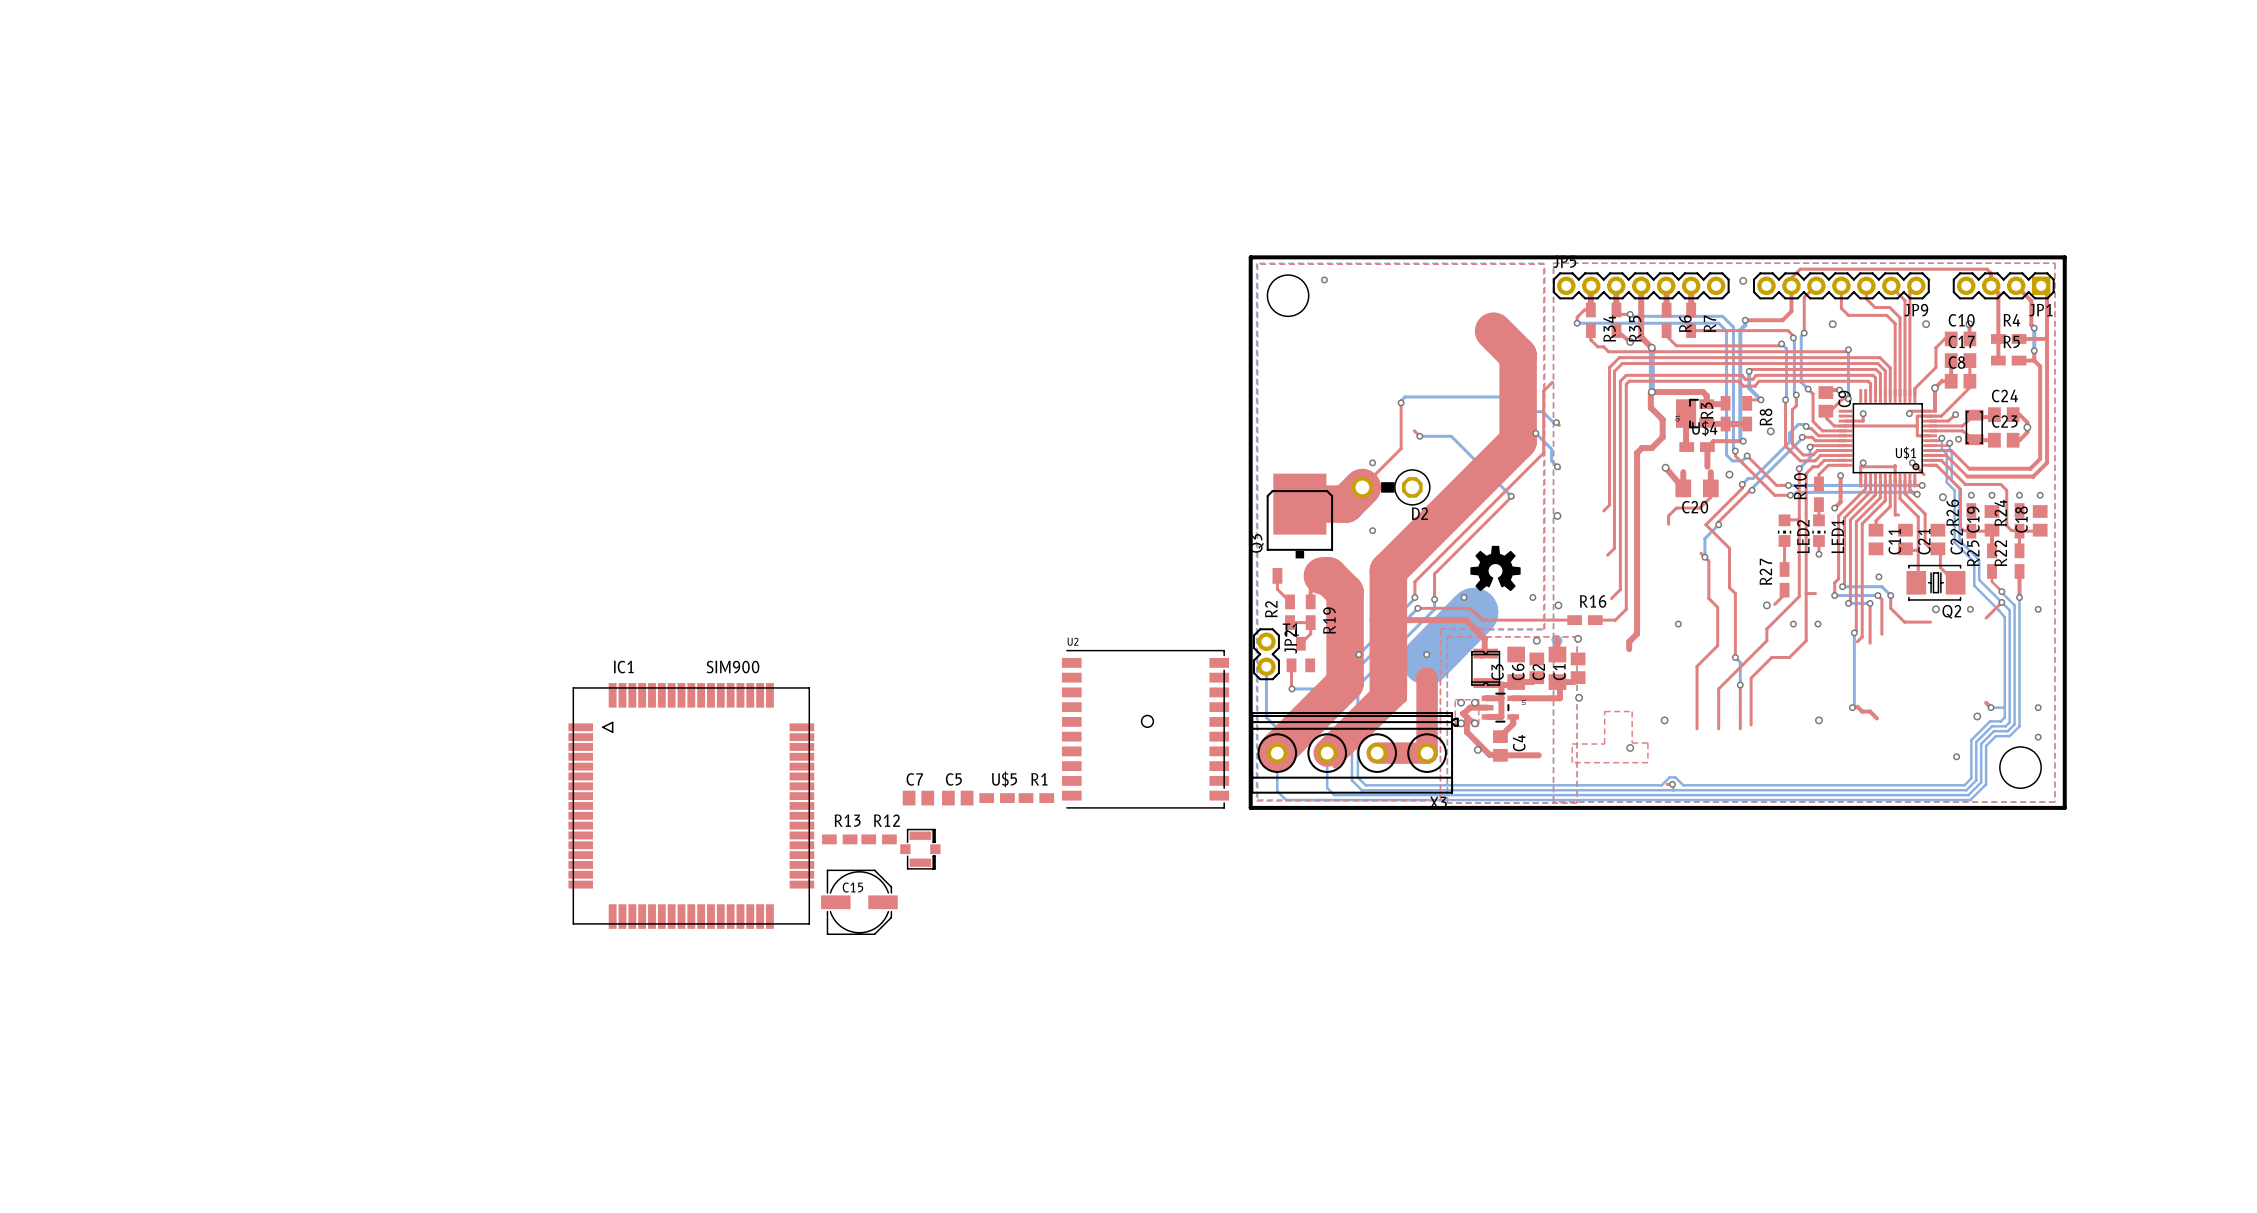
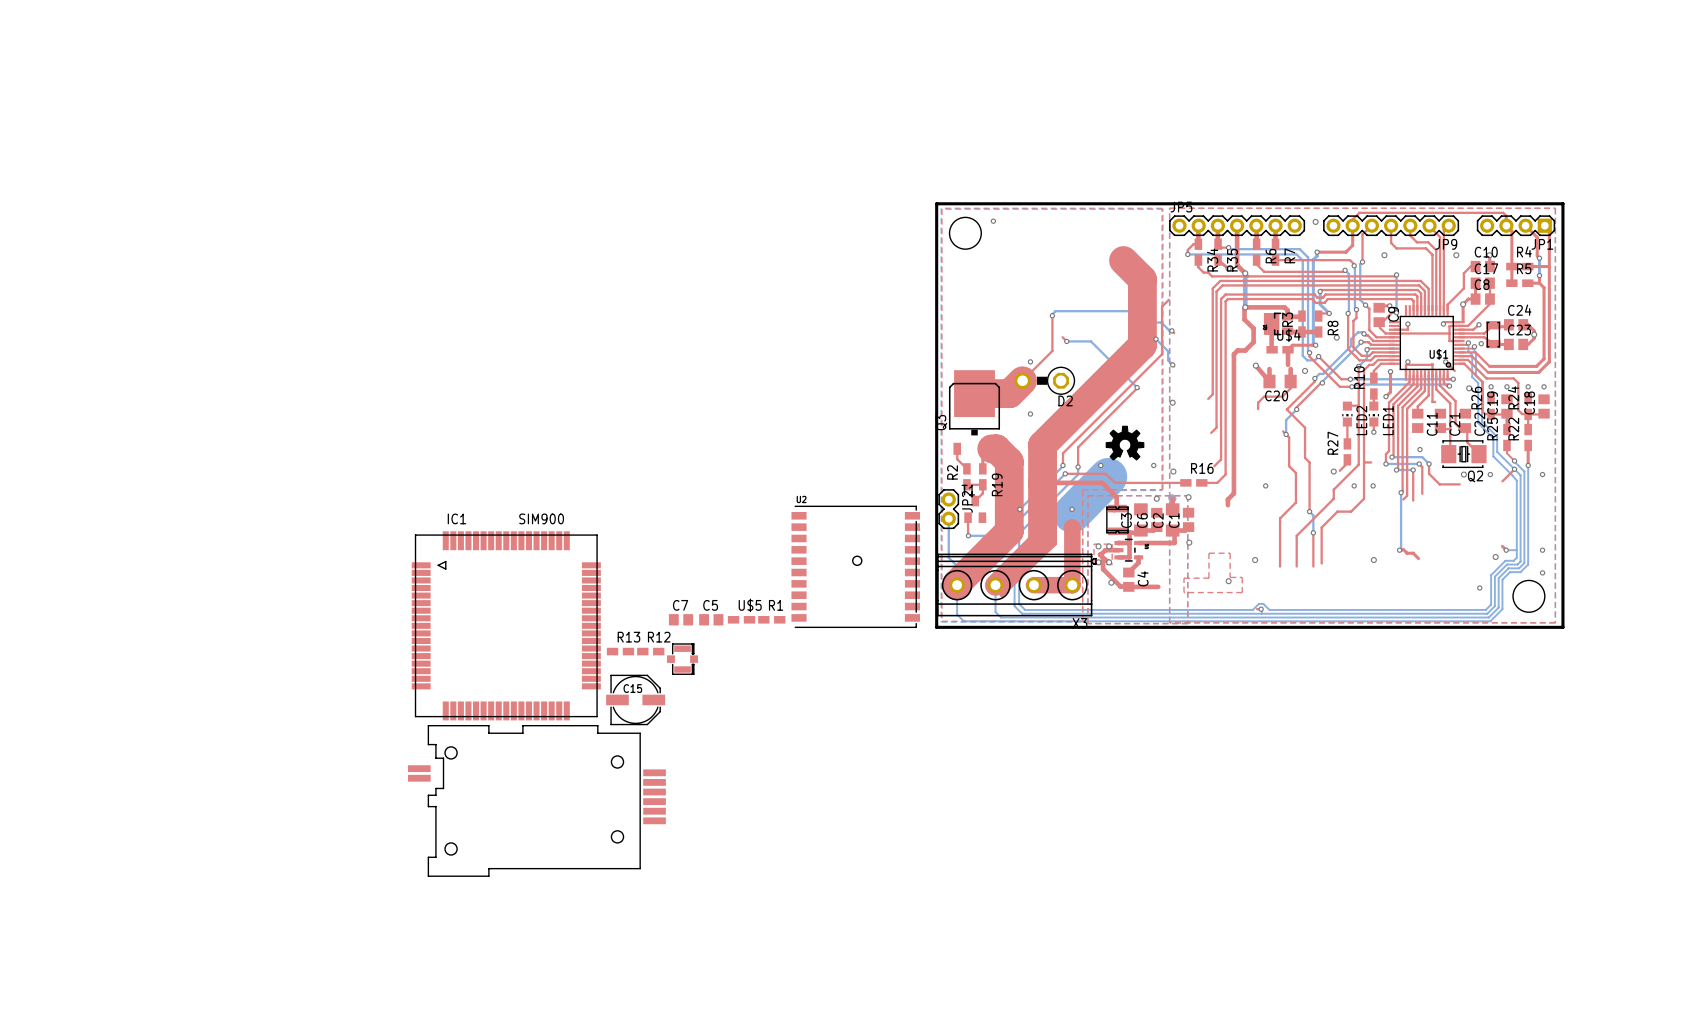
part: none -> (536, 800)

